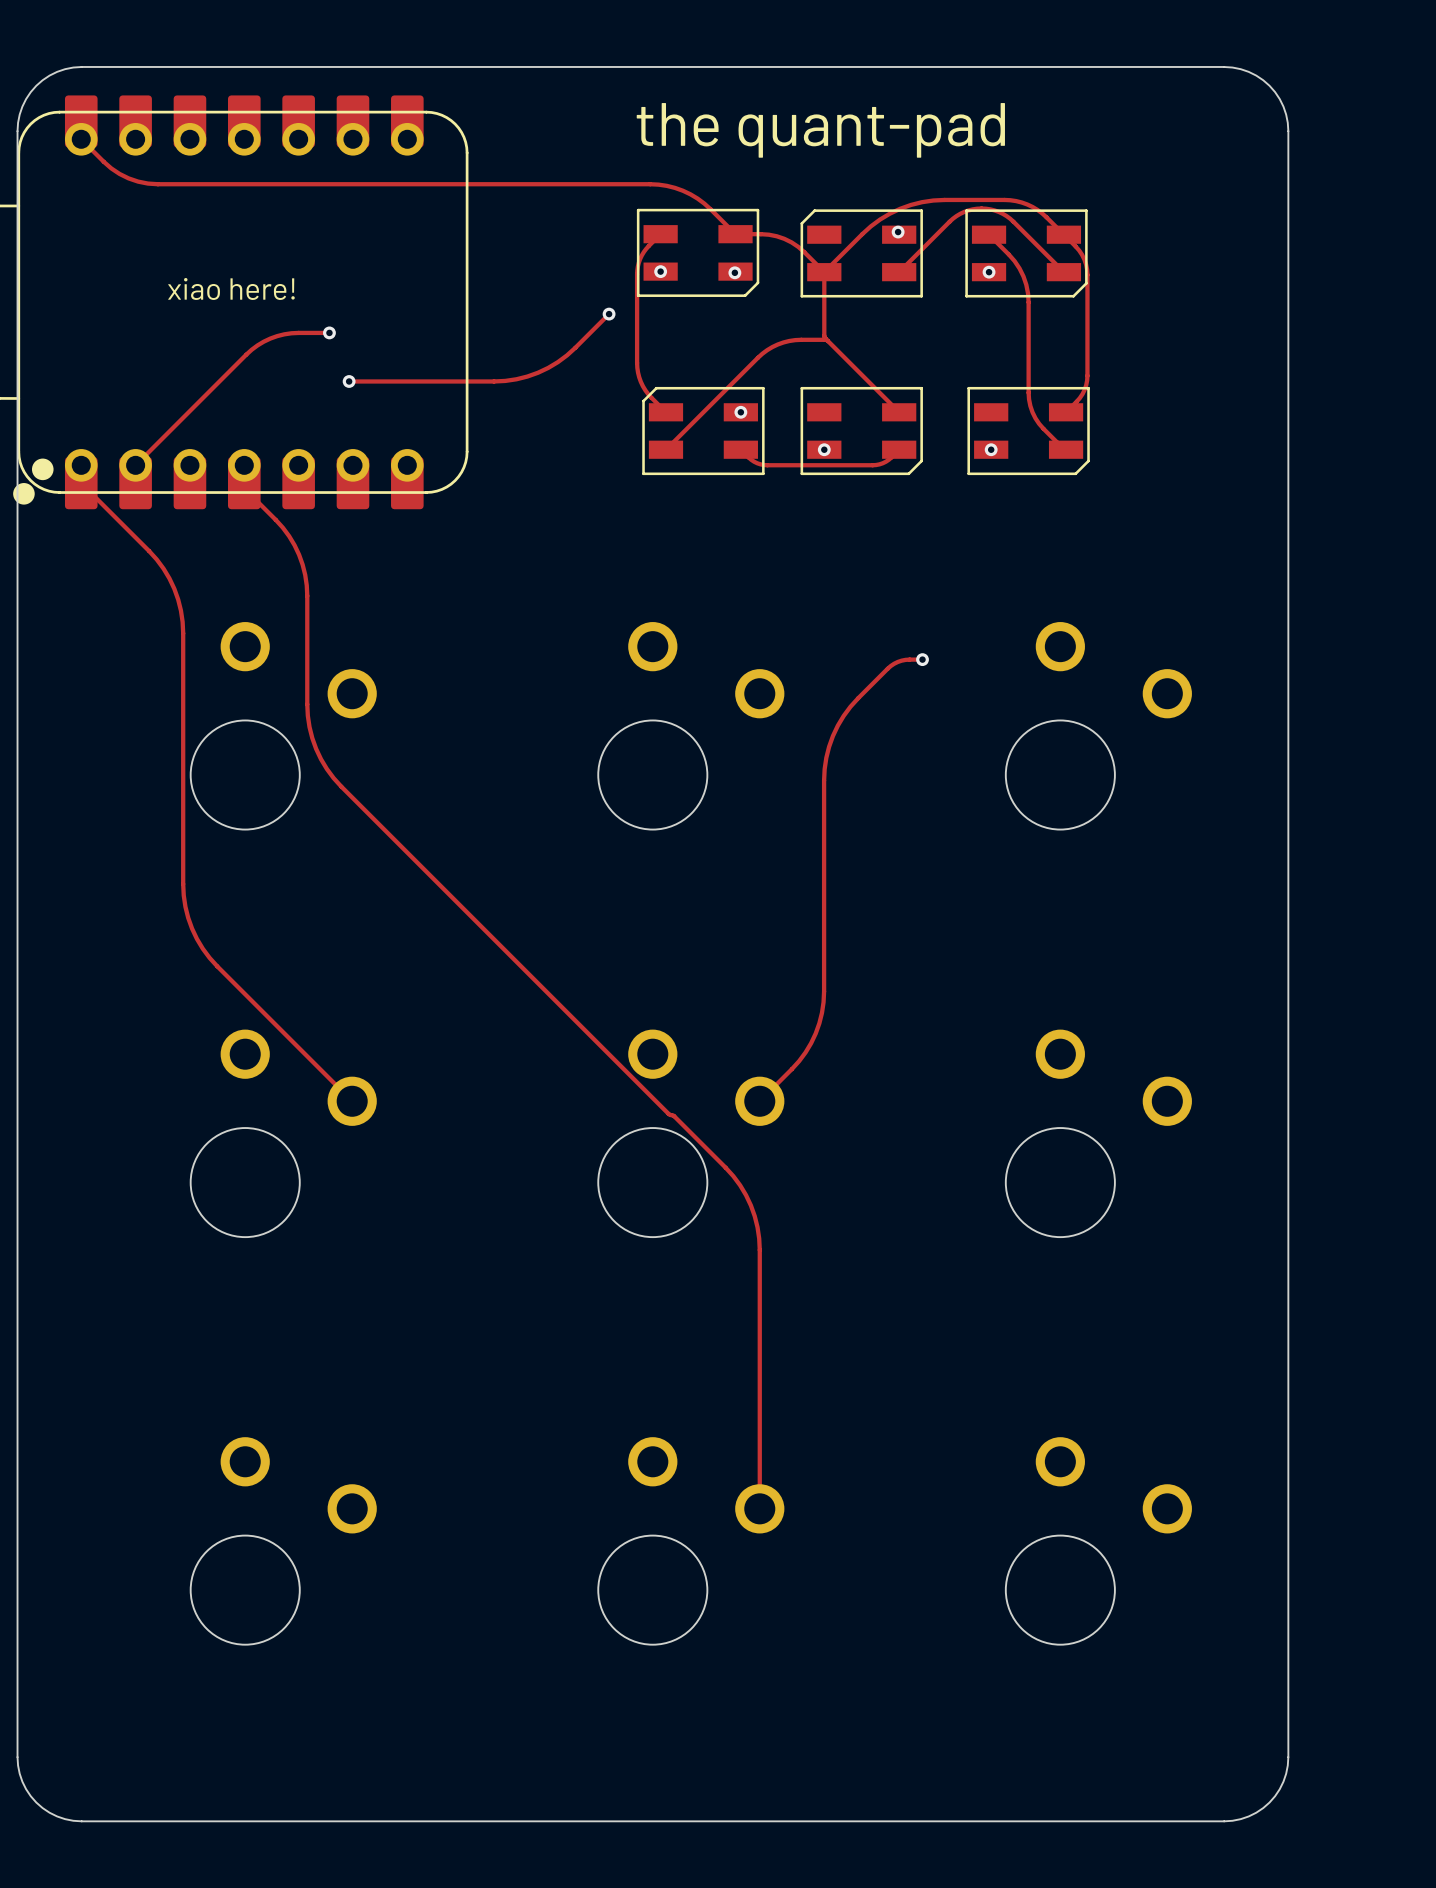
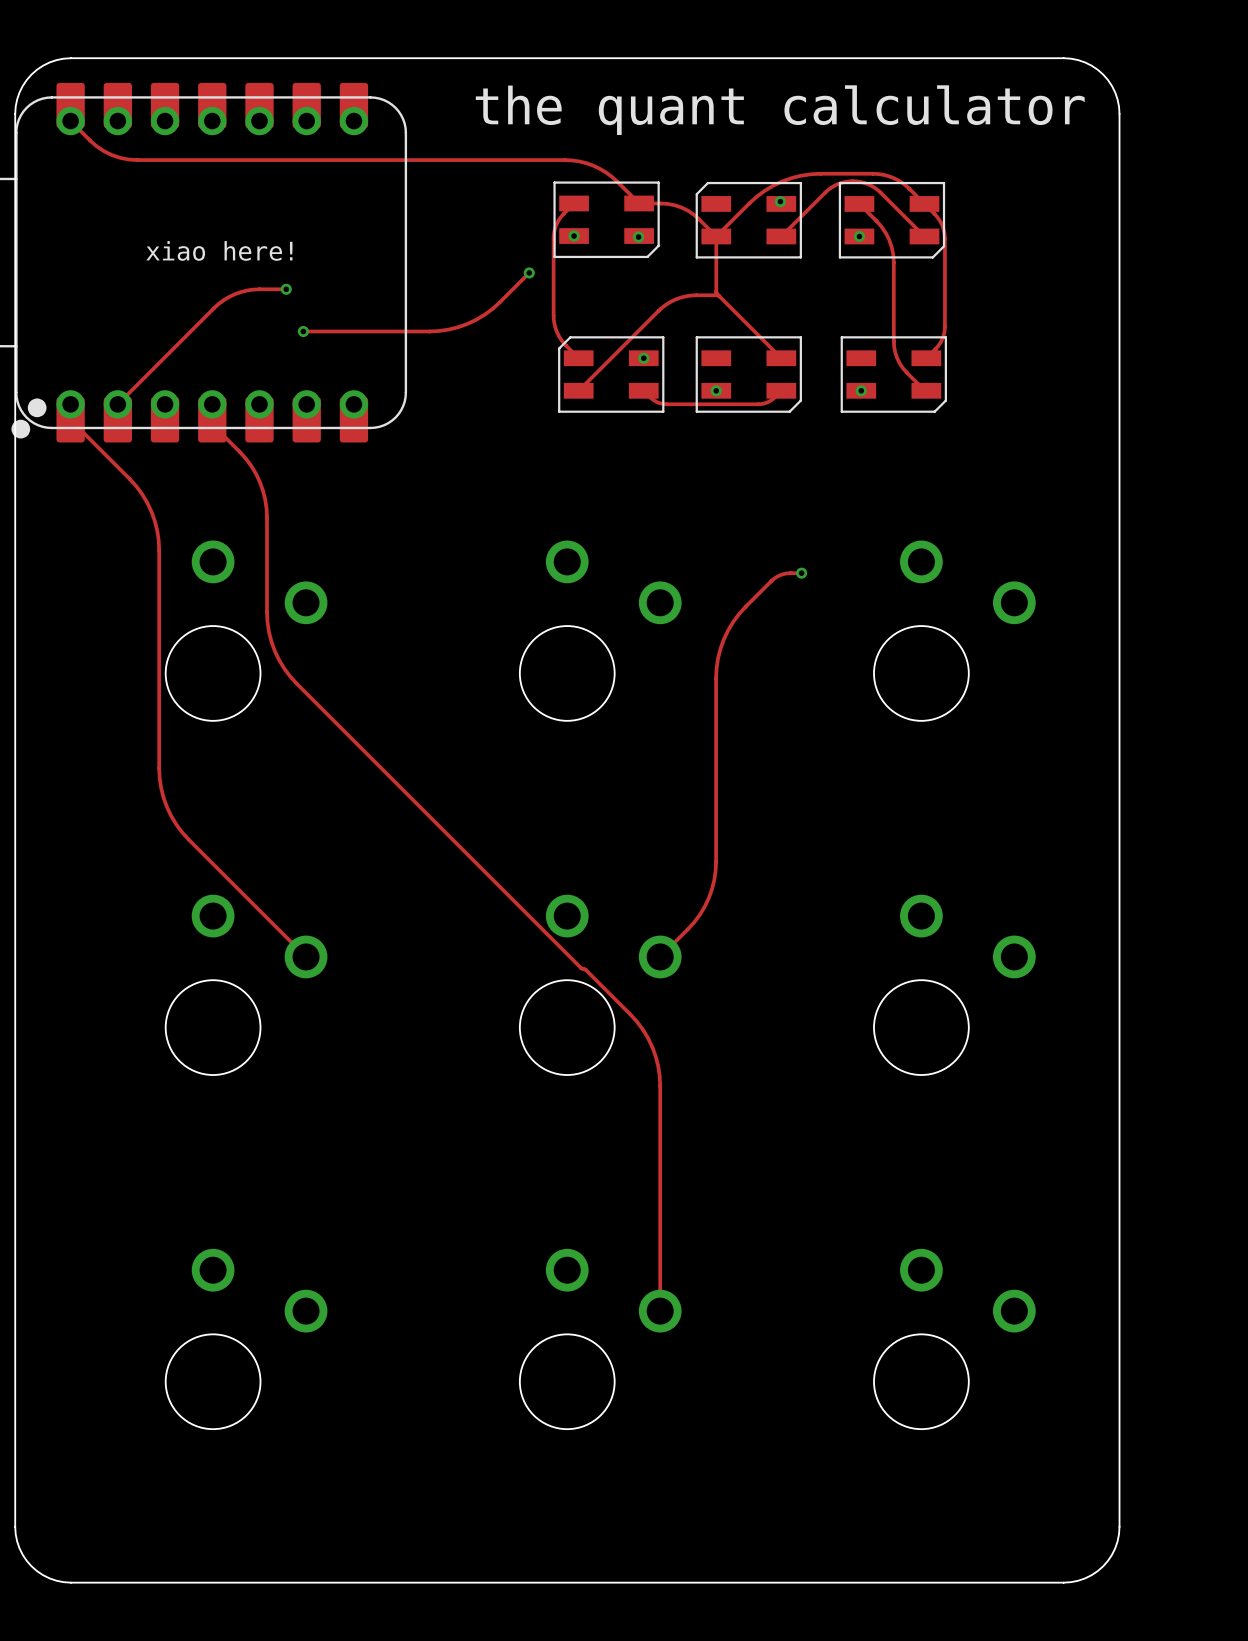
text: the quant-pad (820, 130) -> the quant calculator (780, 110)

